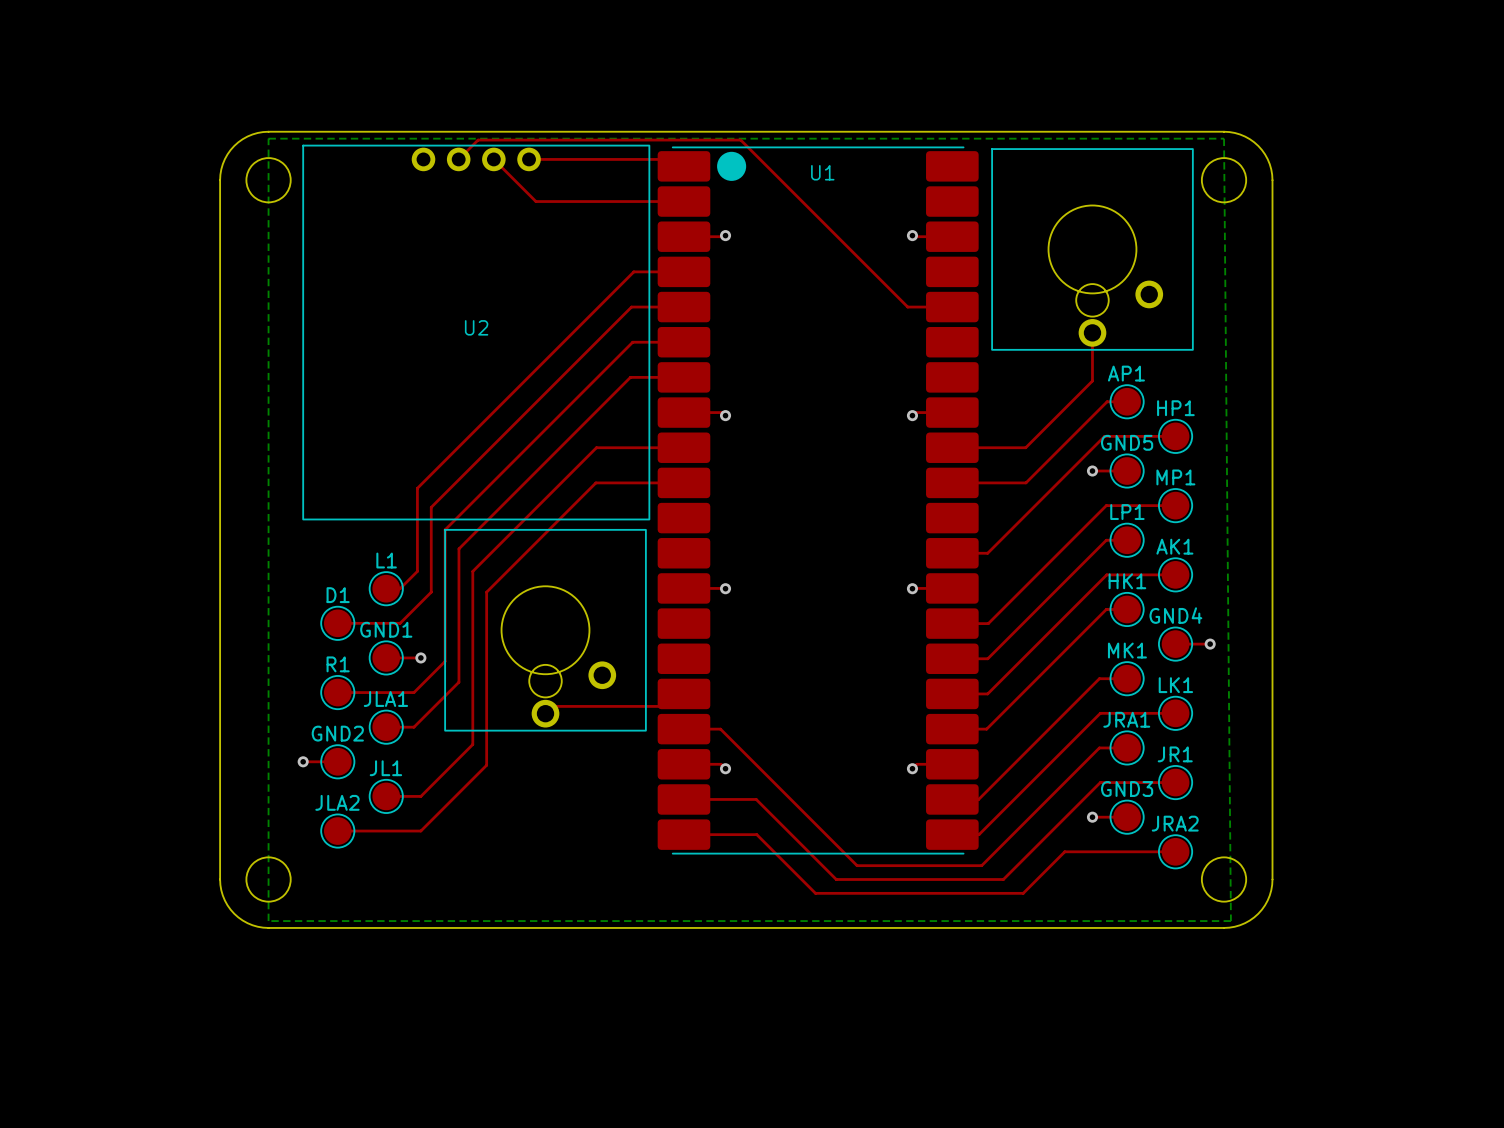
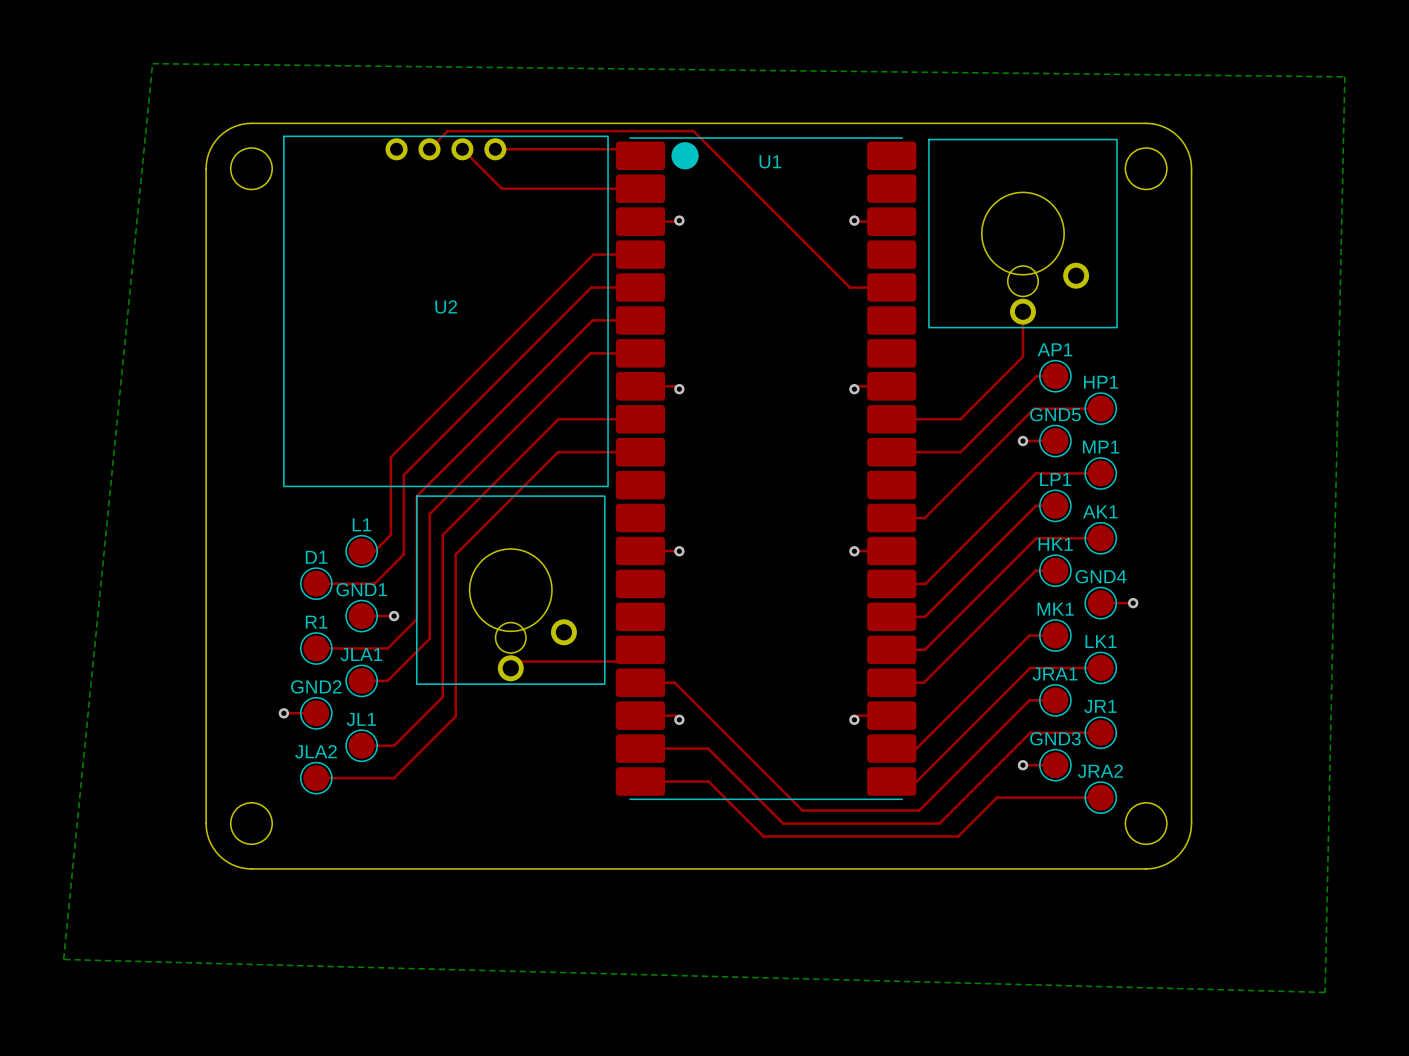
bottom zone outline: (268, 138) (1224, 138) (1230, 921) (268, 921) (268, 138) -> (152, 63) (63, 959) (1325, 992) (1344, 76) (152, 63)

